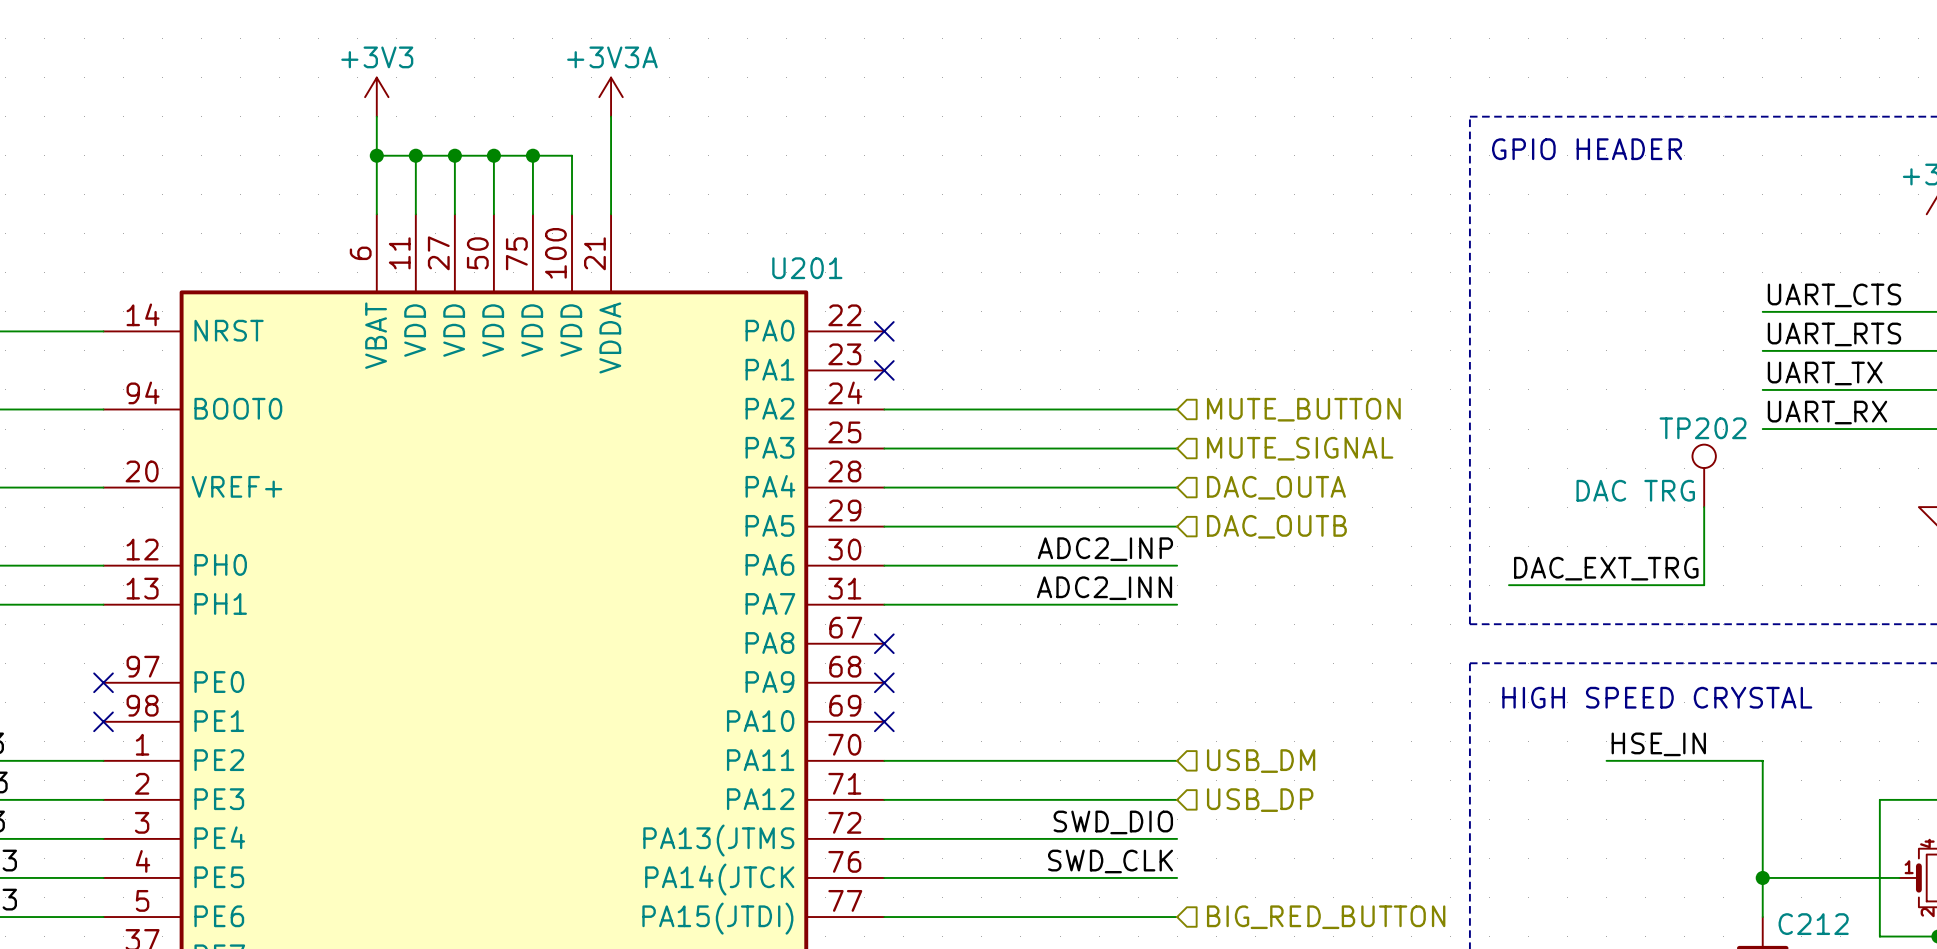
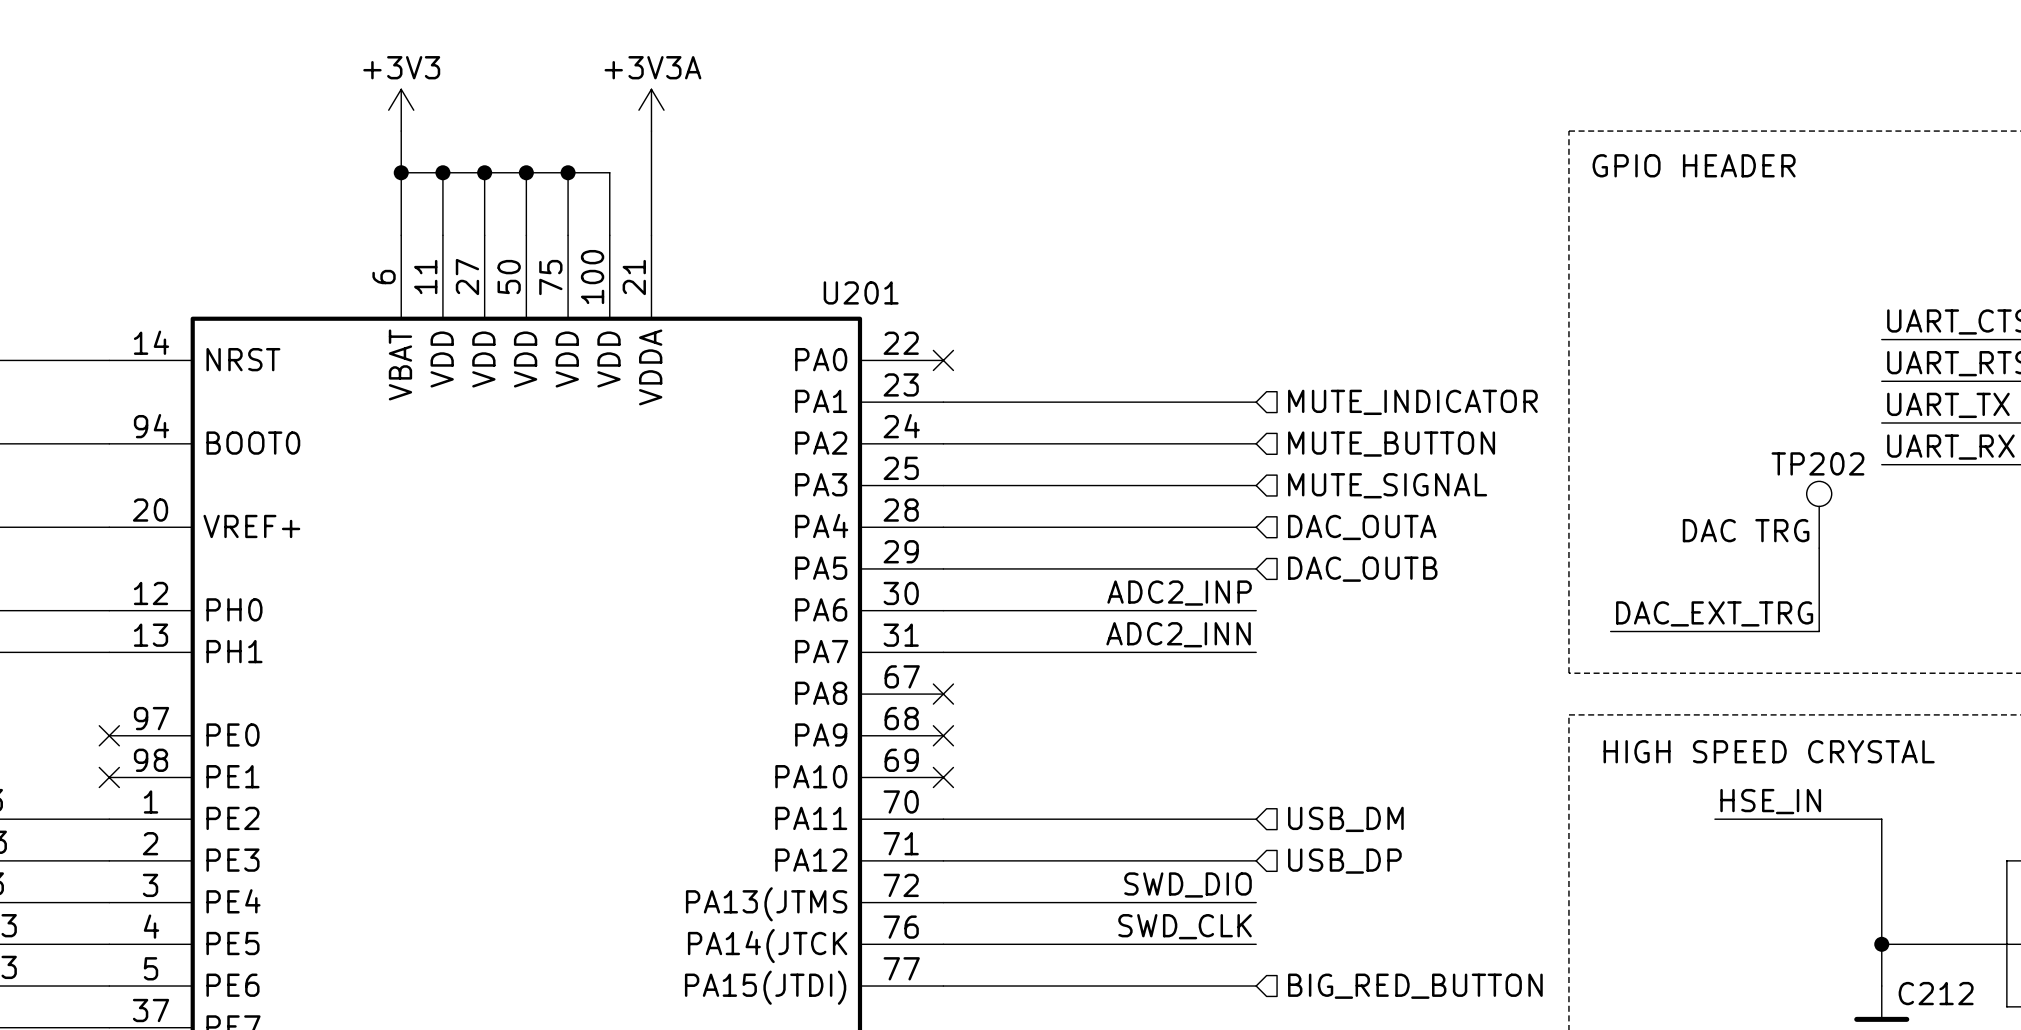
wire: none -> (943, 402) (1256, 402)
no-connect mark: (884, 370) -> none
hierarchical label: none -> MUTE_INDICATOR (1412, 402)

